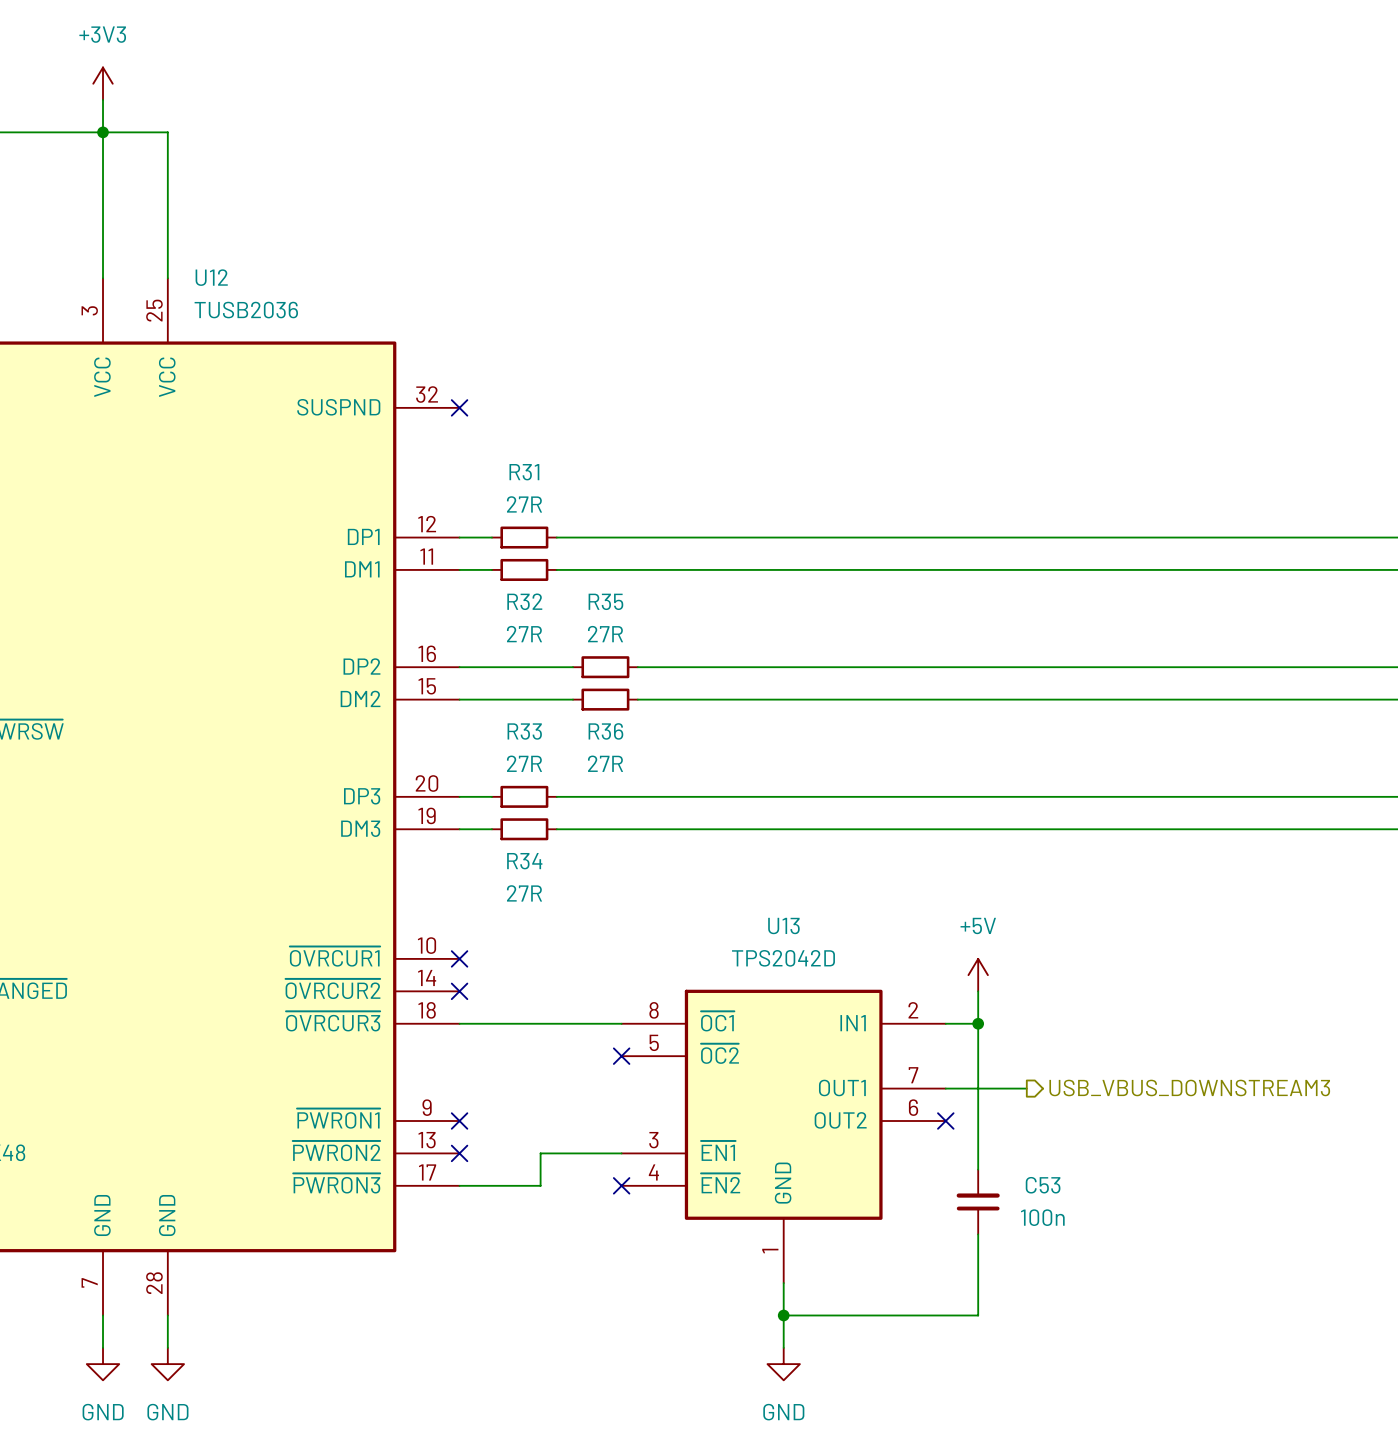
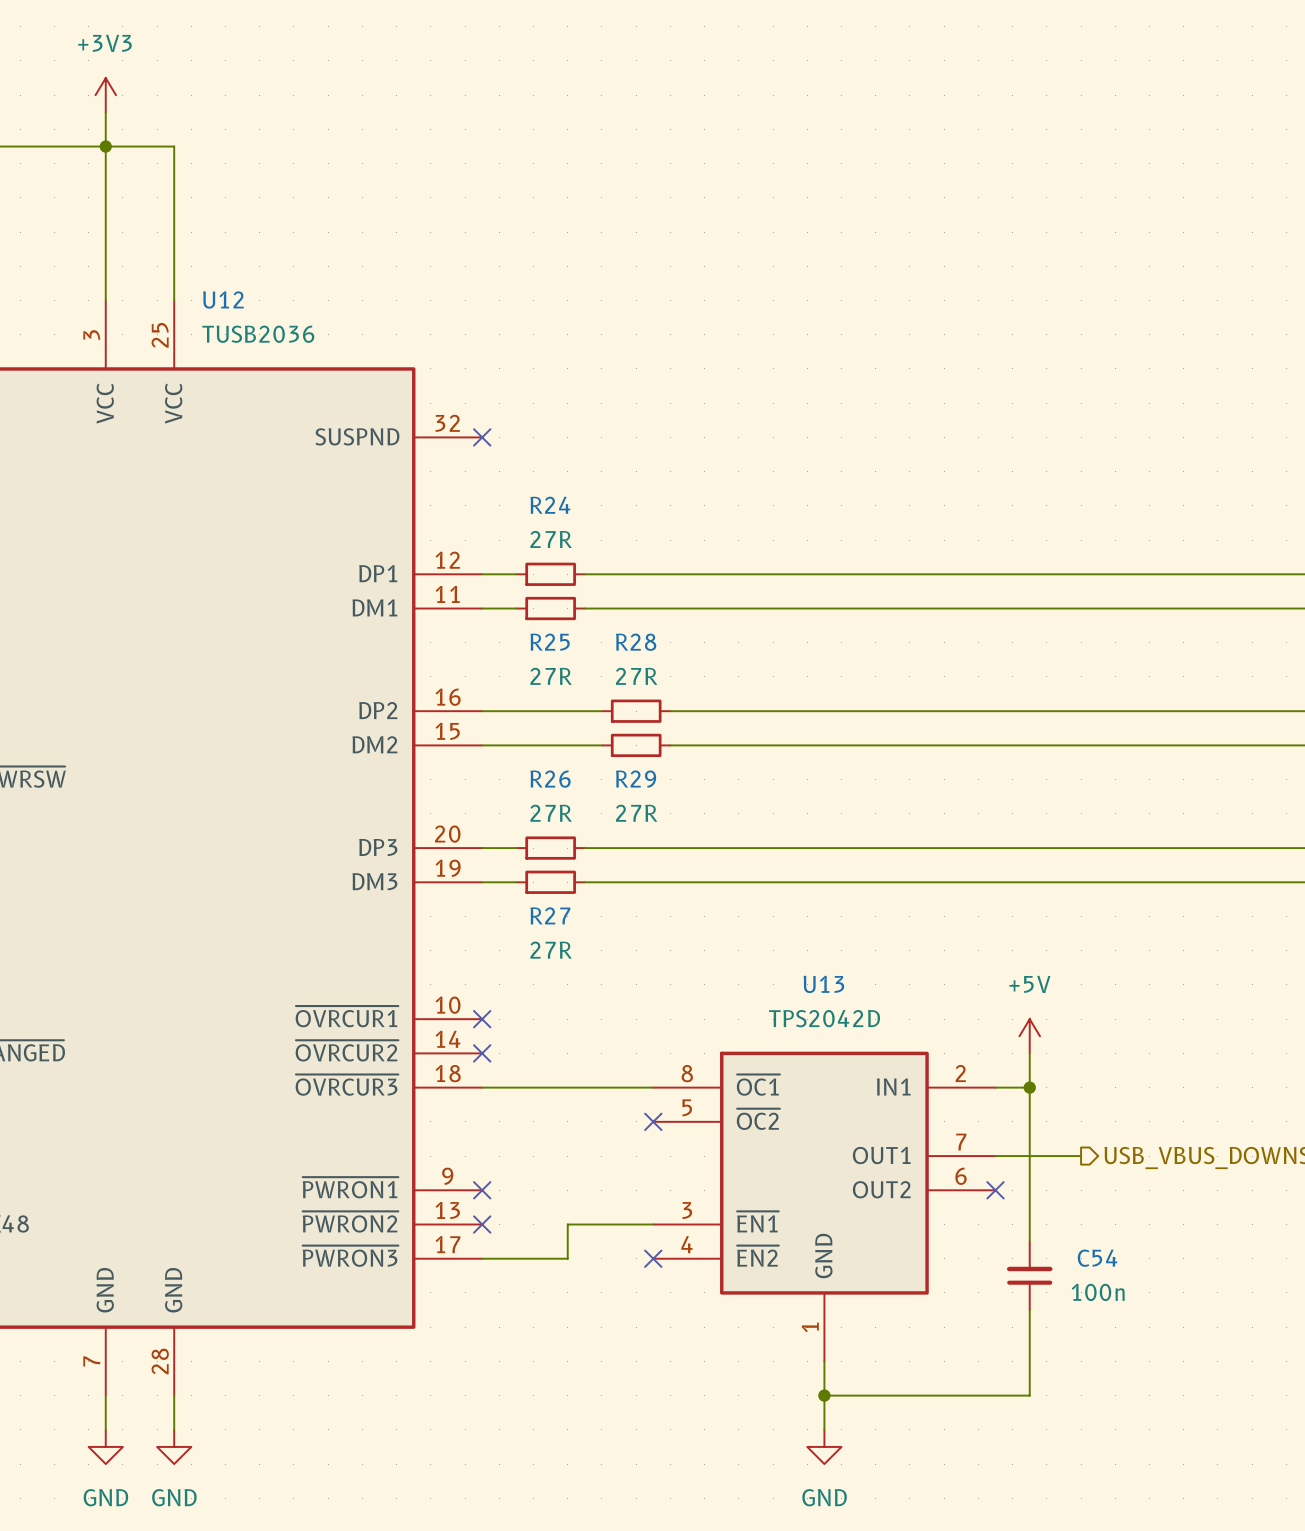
R31 name: R31 (524, 472) -> R24 (550, 505)
R32 name: R32 (524, 601) -> R25 (550, 642)
R35 name: R35 (605, 601) -> R28 (636, 642)
R33 name: R33 (524, 731) -> R26 (550, 779)
R36 name: R36 (605, 731) -> R29 (636, 779)
R34 name: R34 (524, 861) -> R27 (550, 915)
C53 name: C53 (1043, 1185) -> C54 (1097, 1258)

